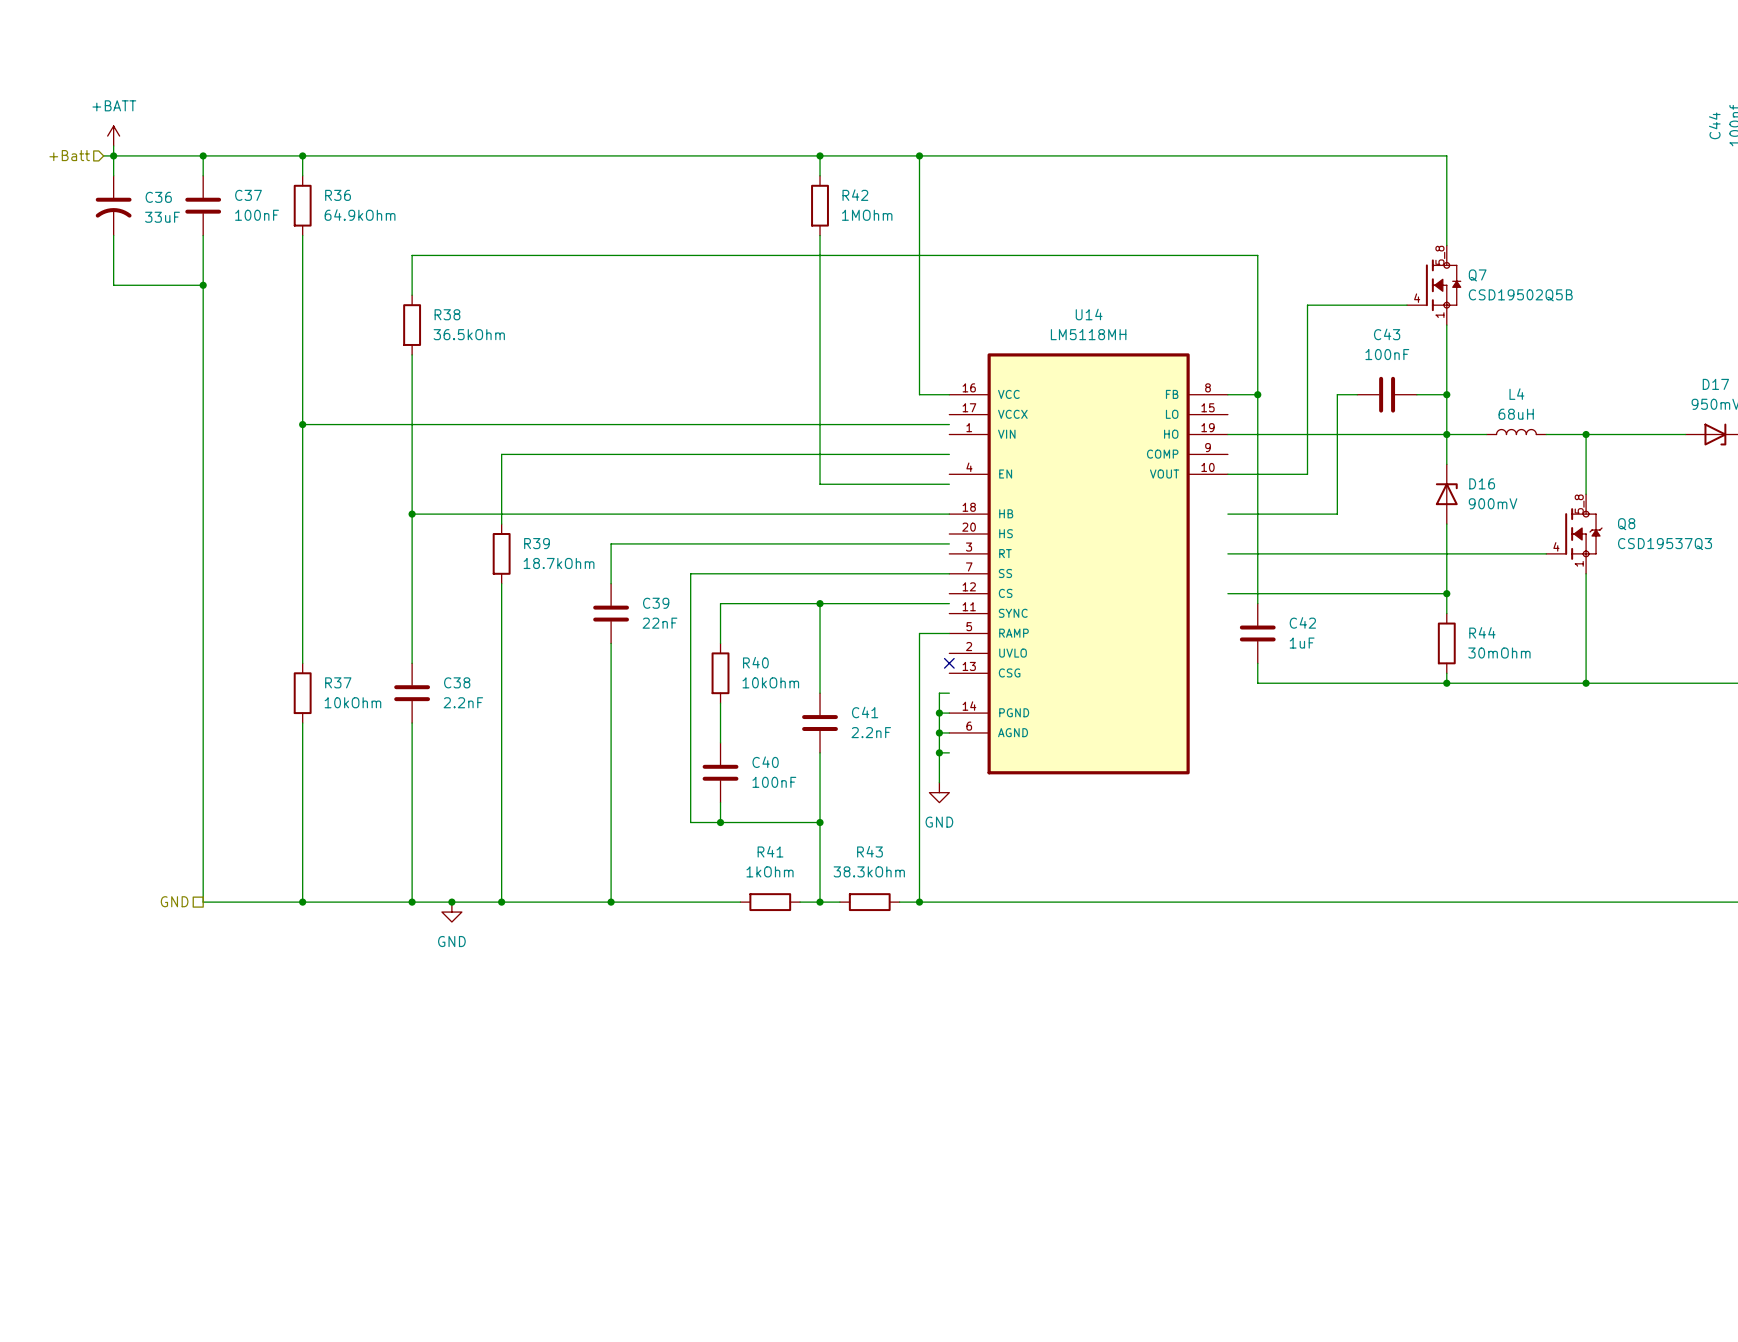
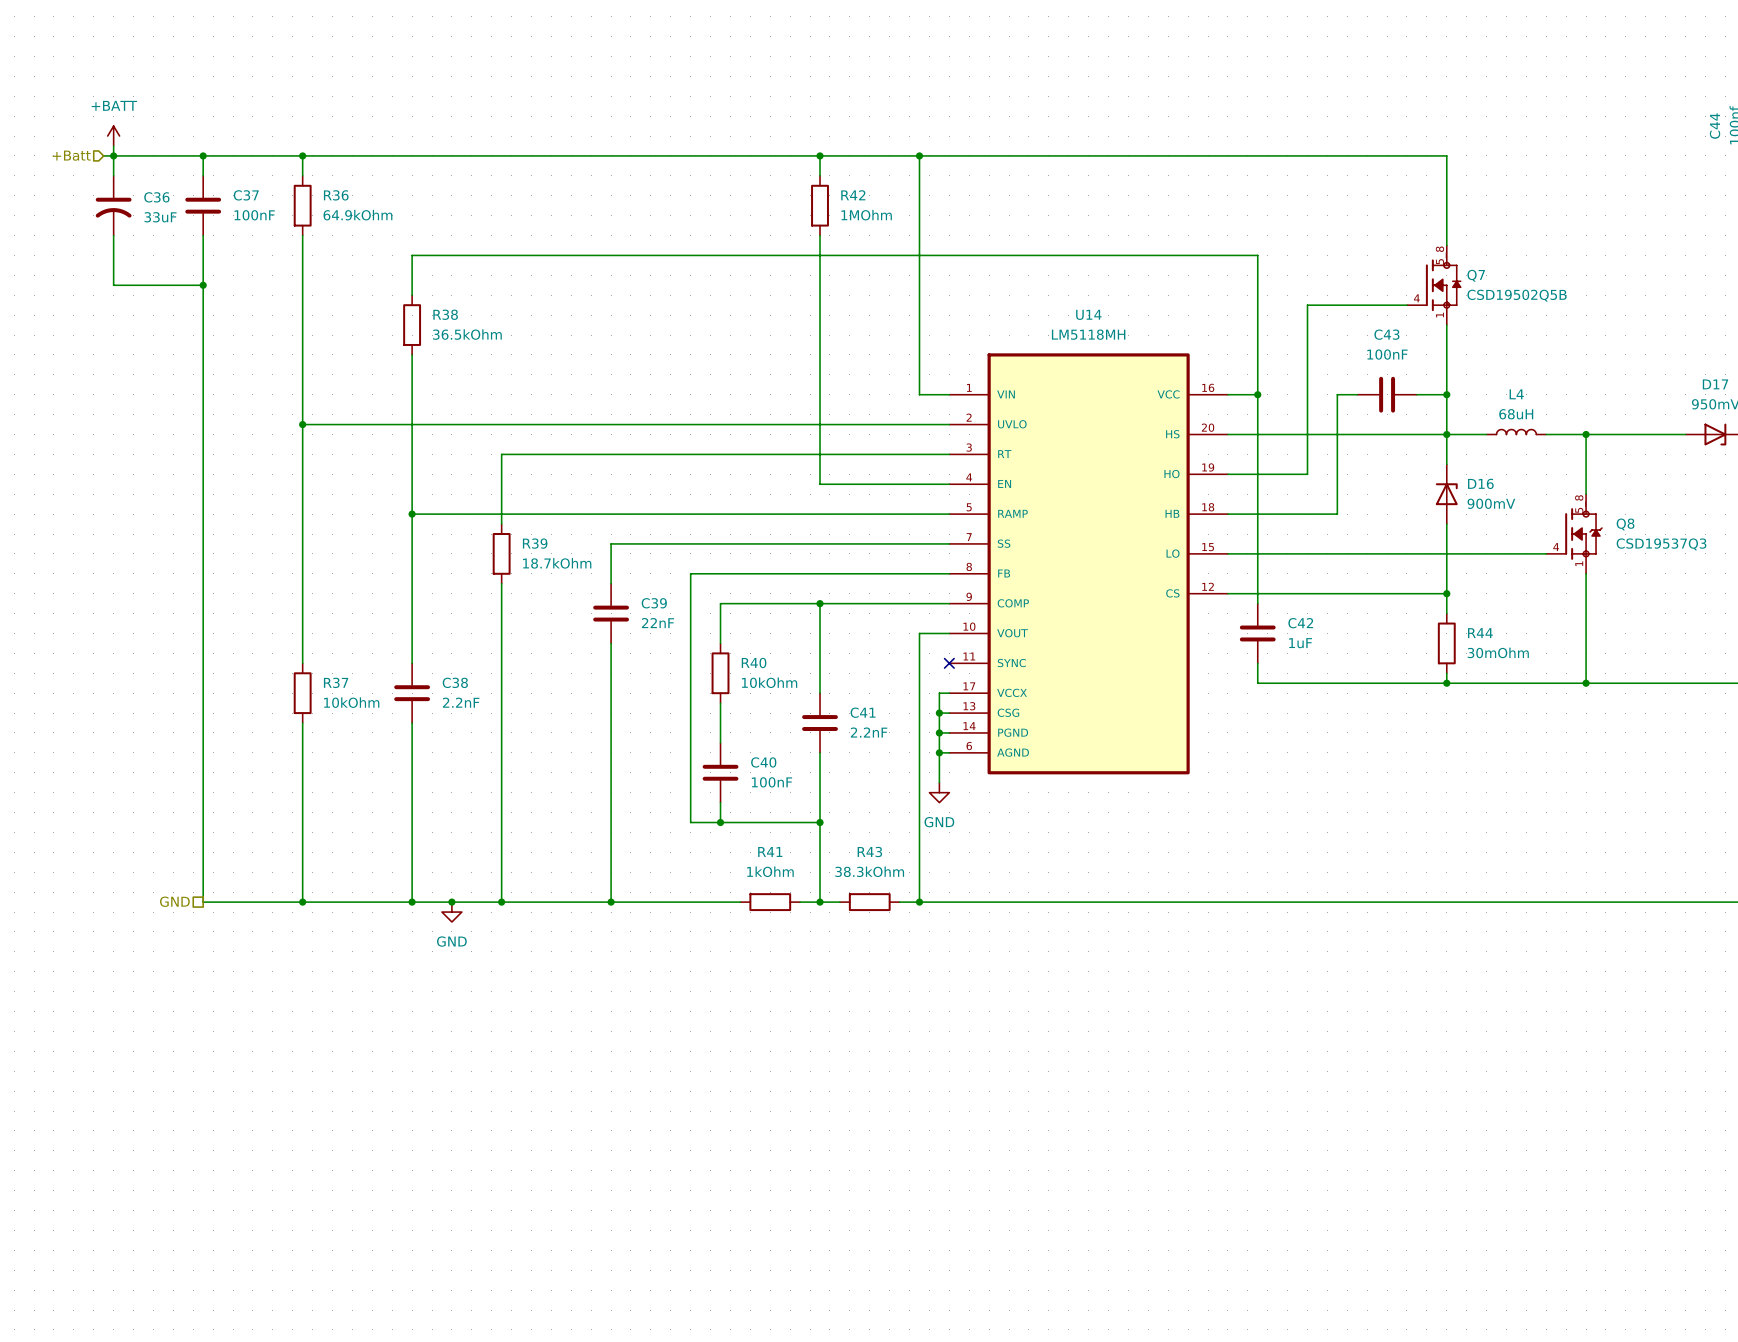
U14 symbol: [949, 353, 1228, 775] -> [949, 353, 1228, 775]

